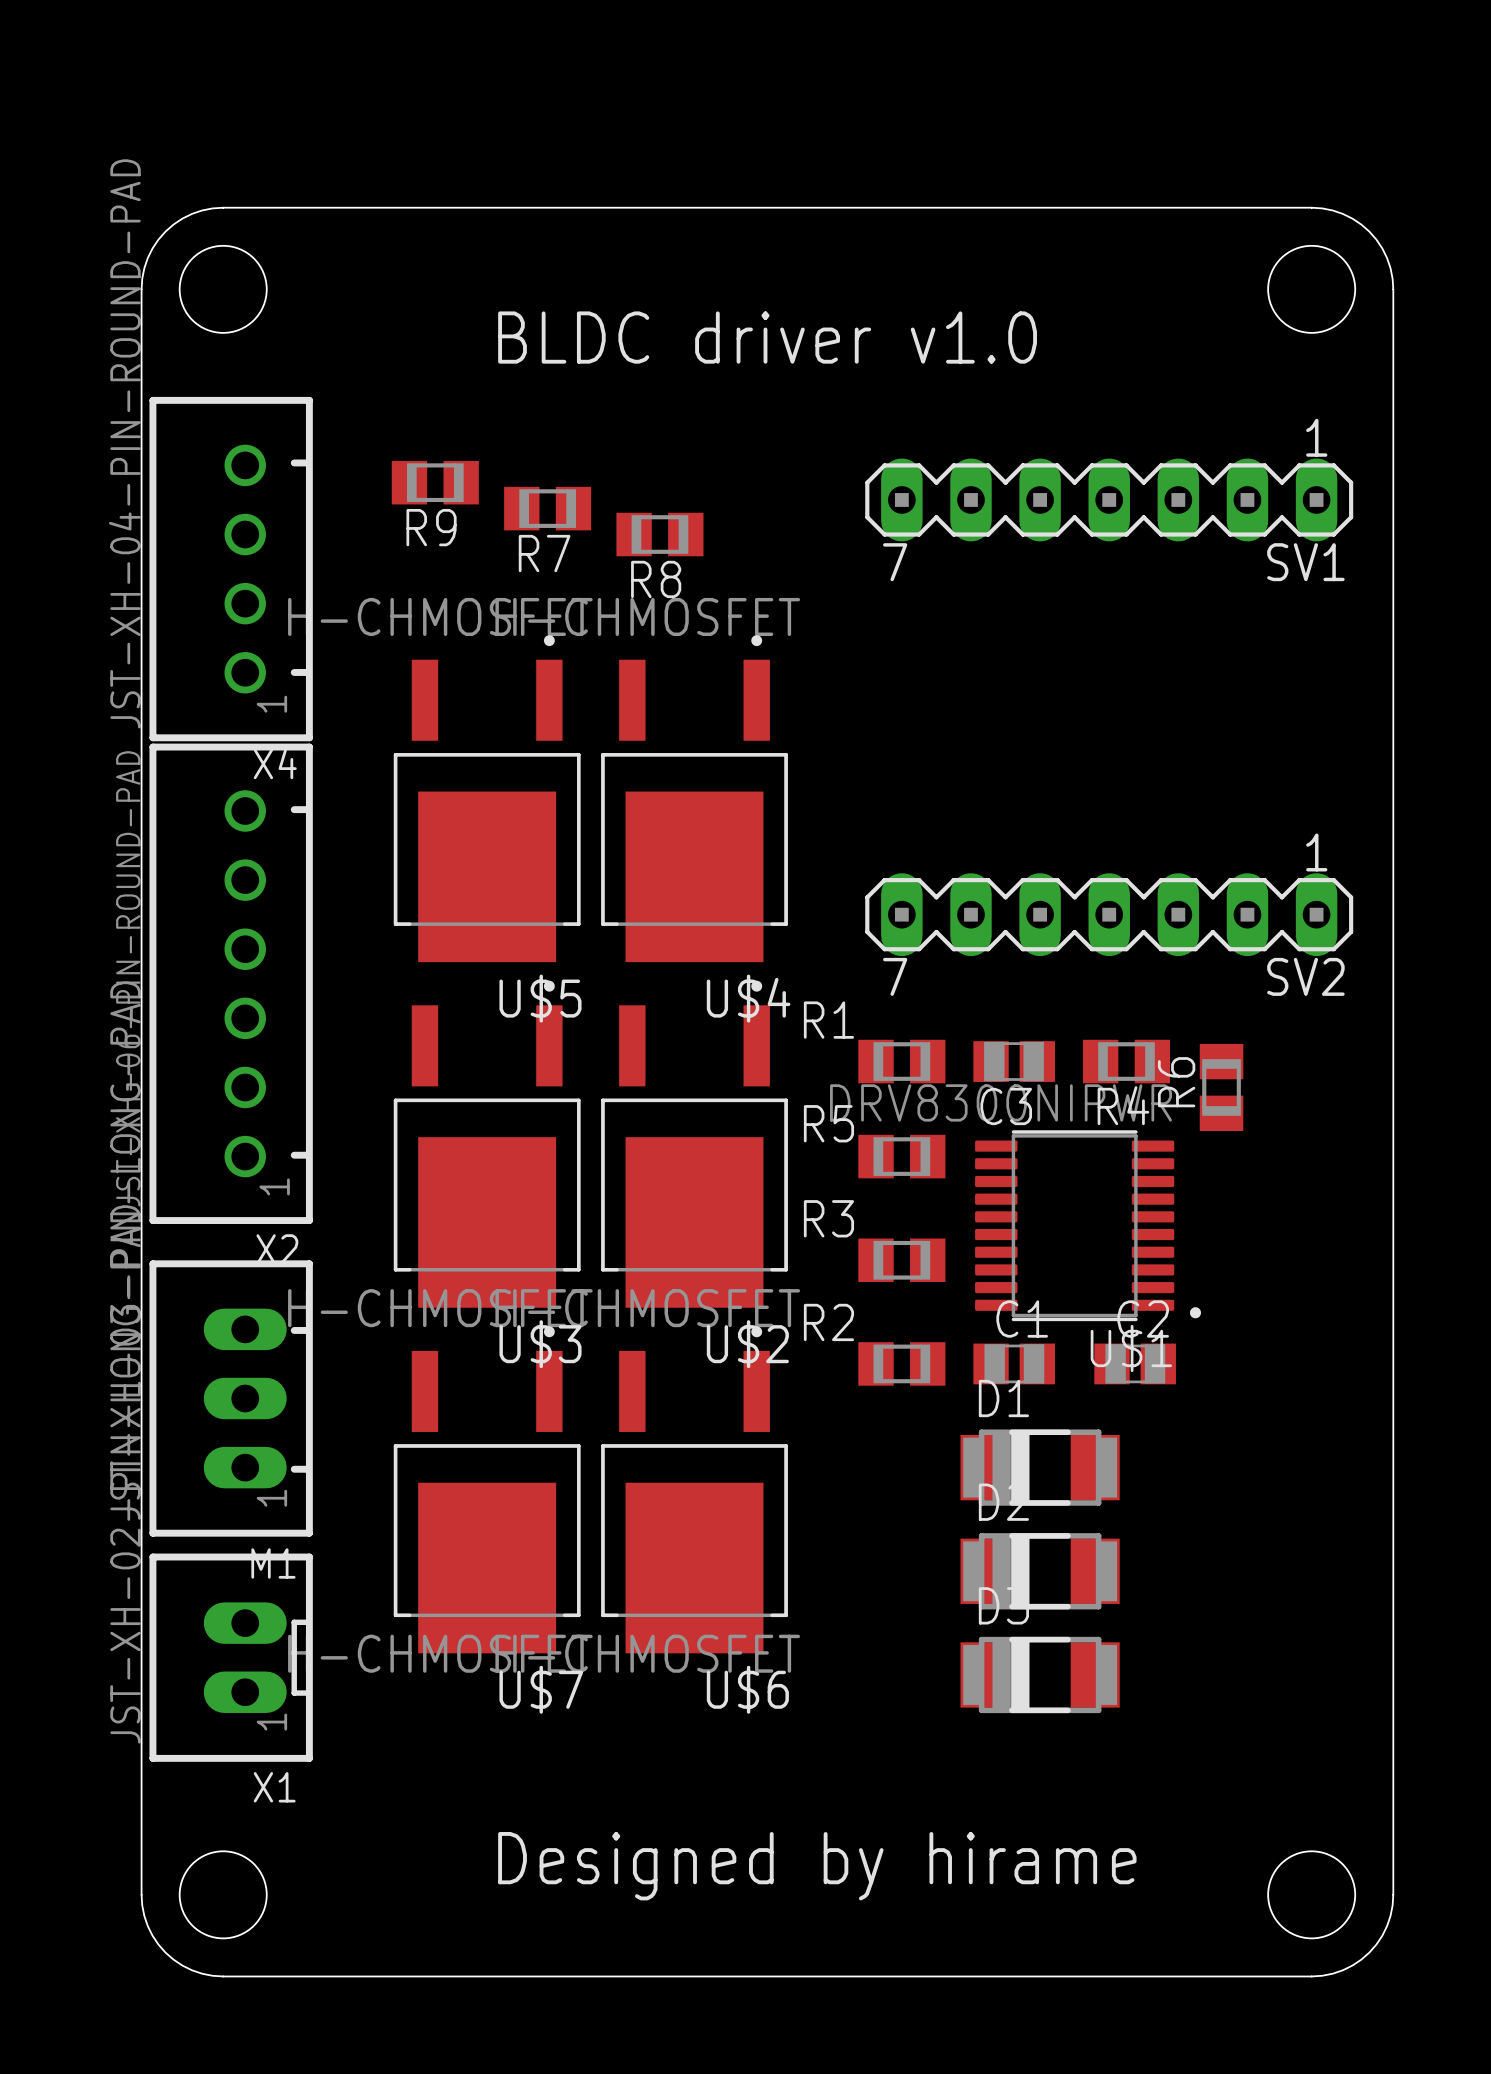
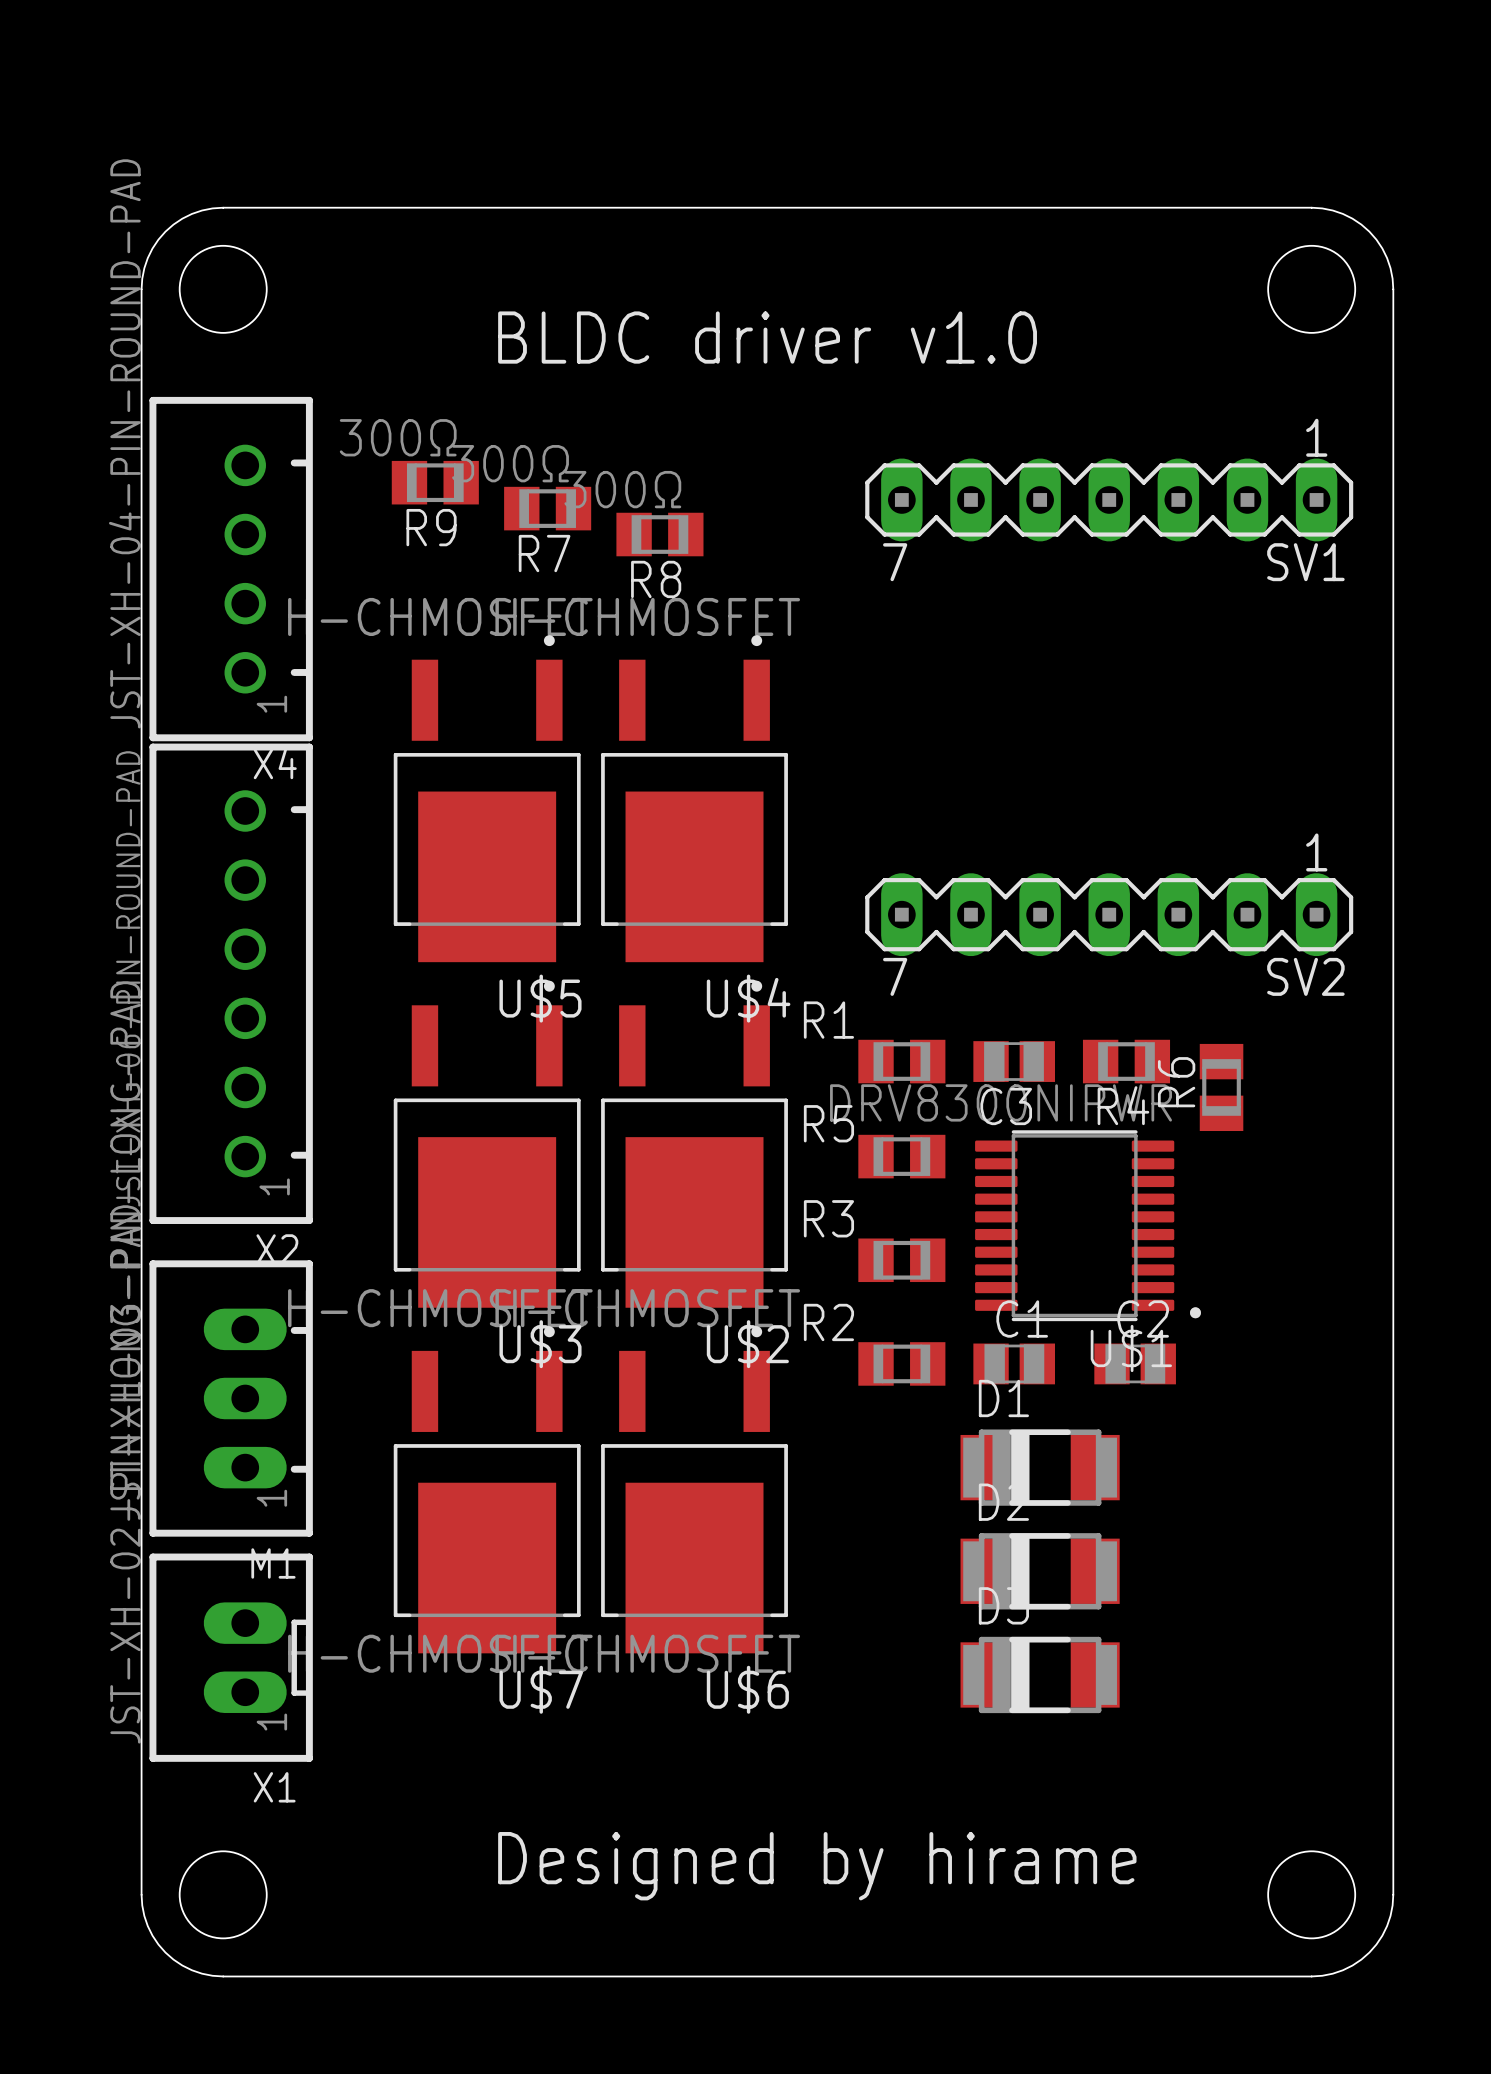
R9 value: none -> 300Ω (398, 437)
R7 value: none -> 300Ω (510, 463)
R8 value: none -> 300Ω (622, 489)

